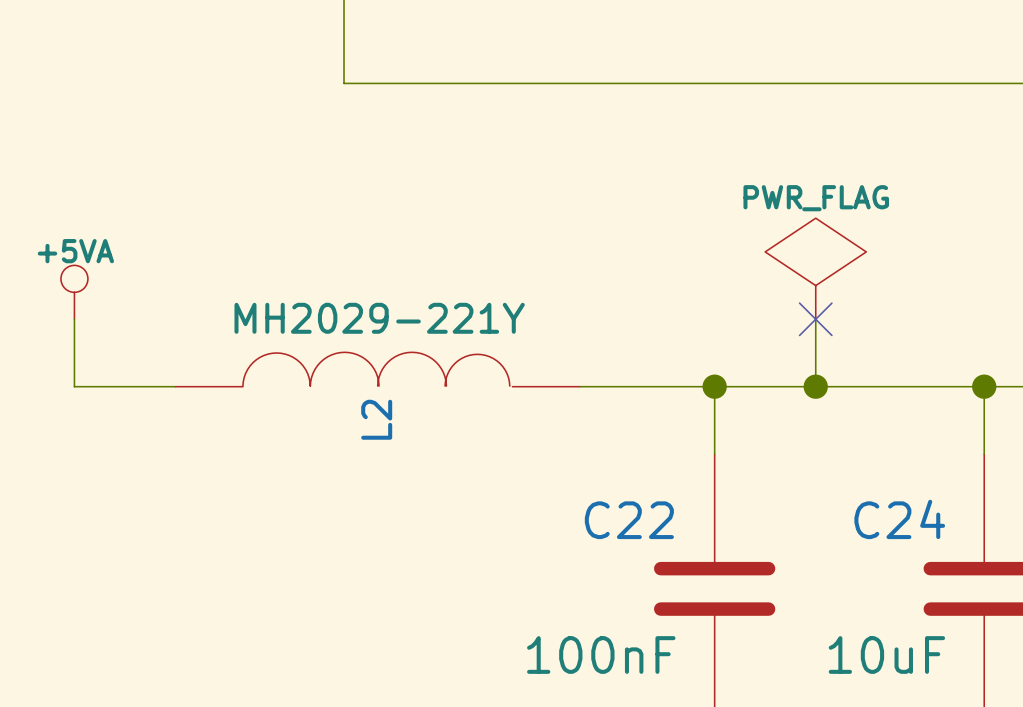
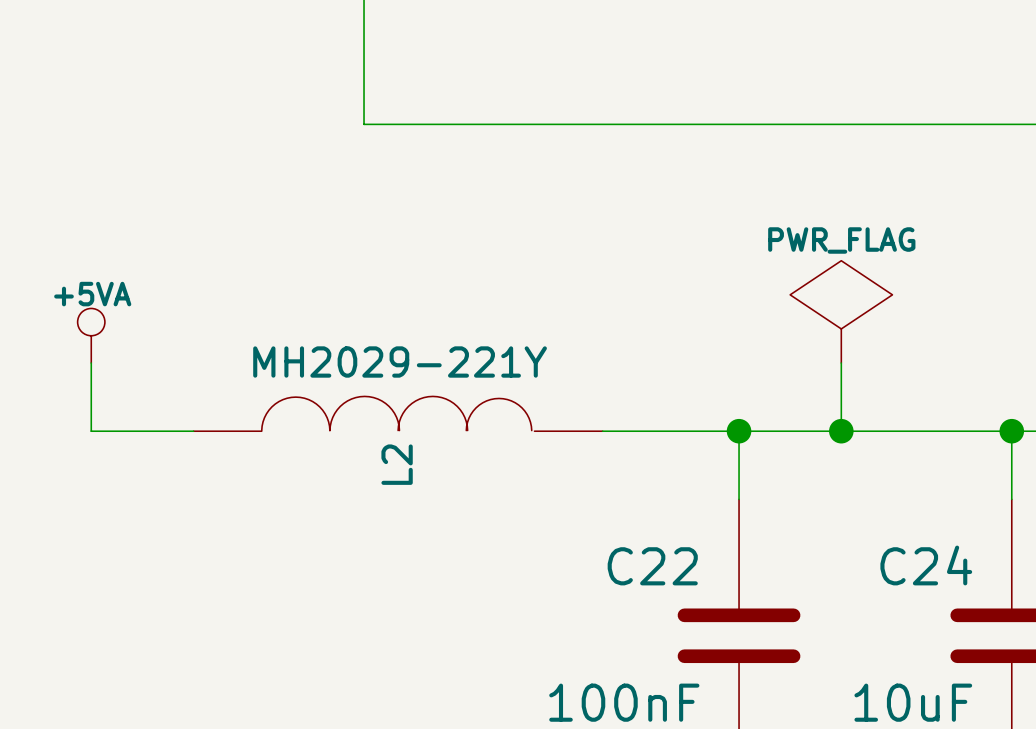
no-connect mark: (815, 319) -> none

